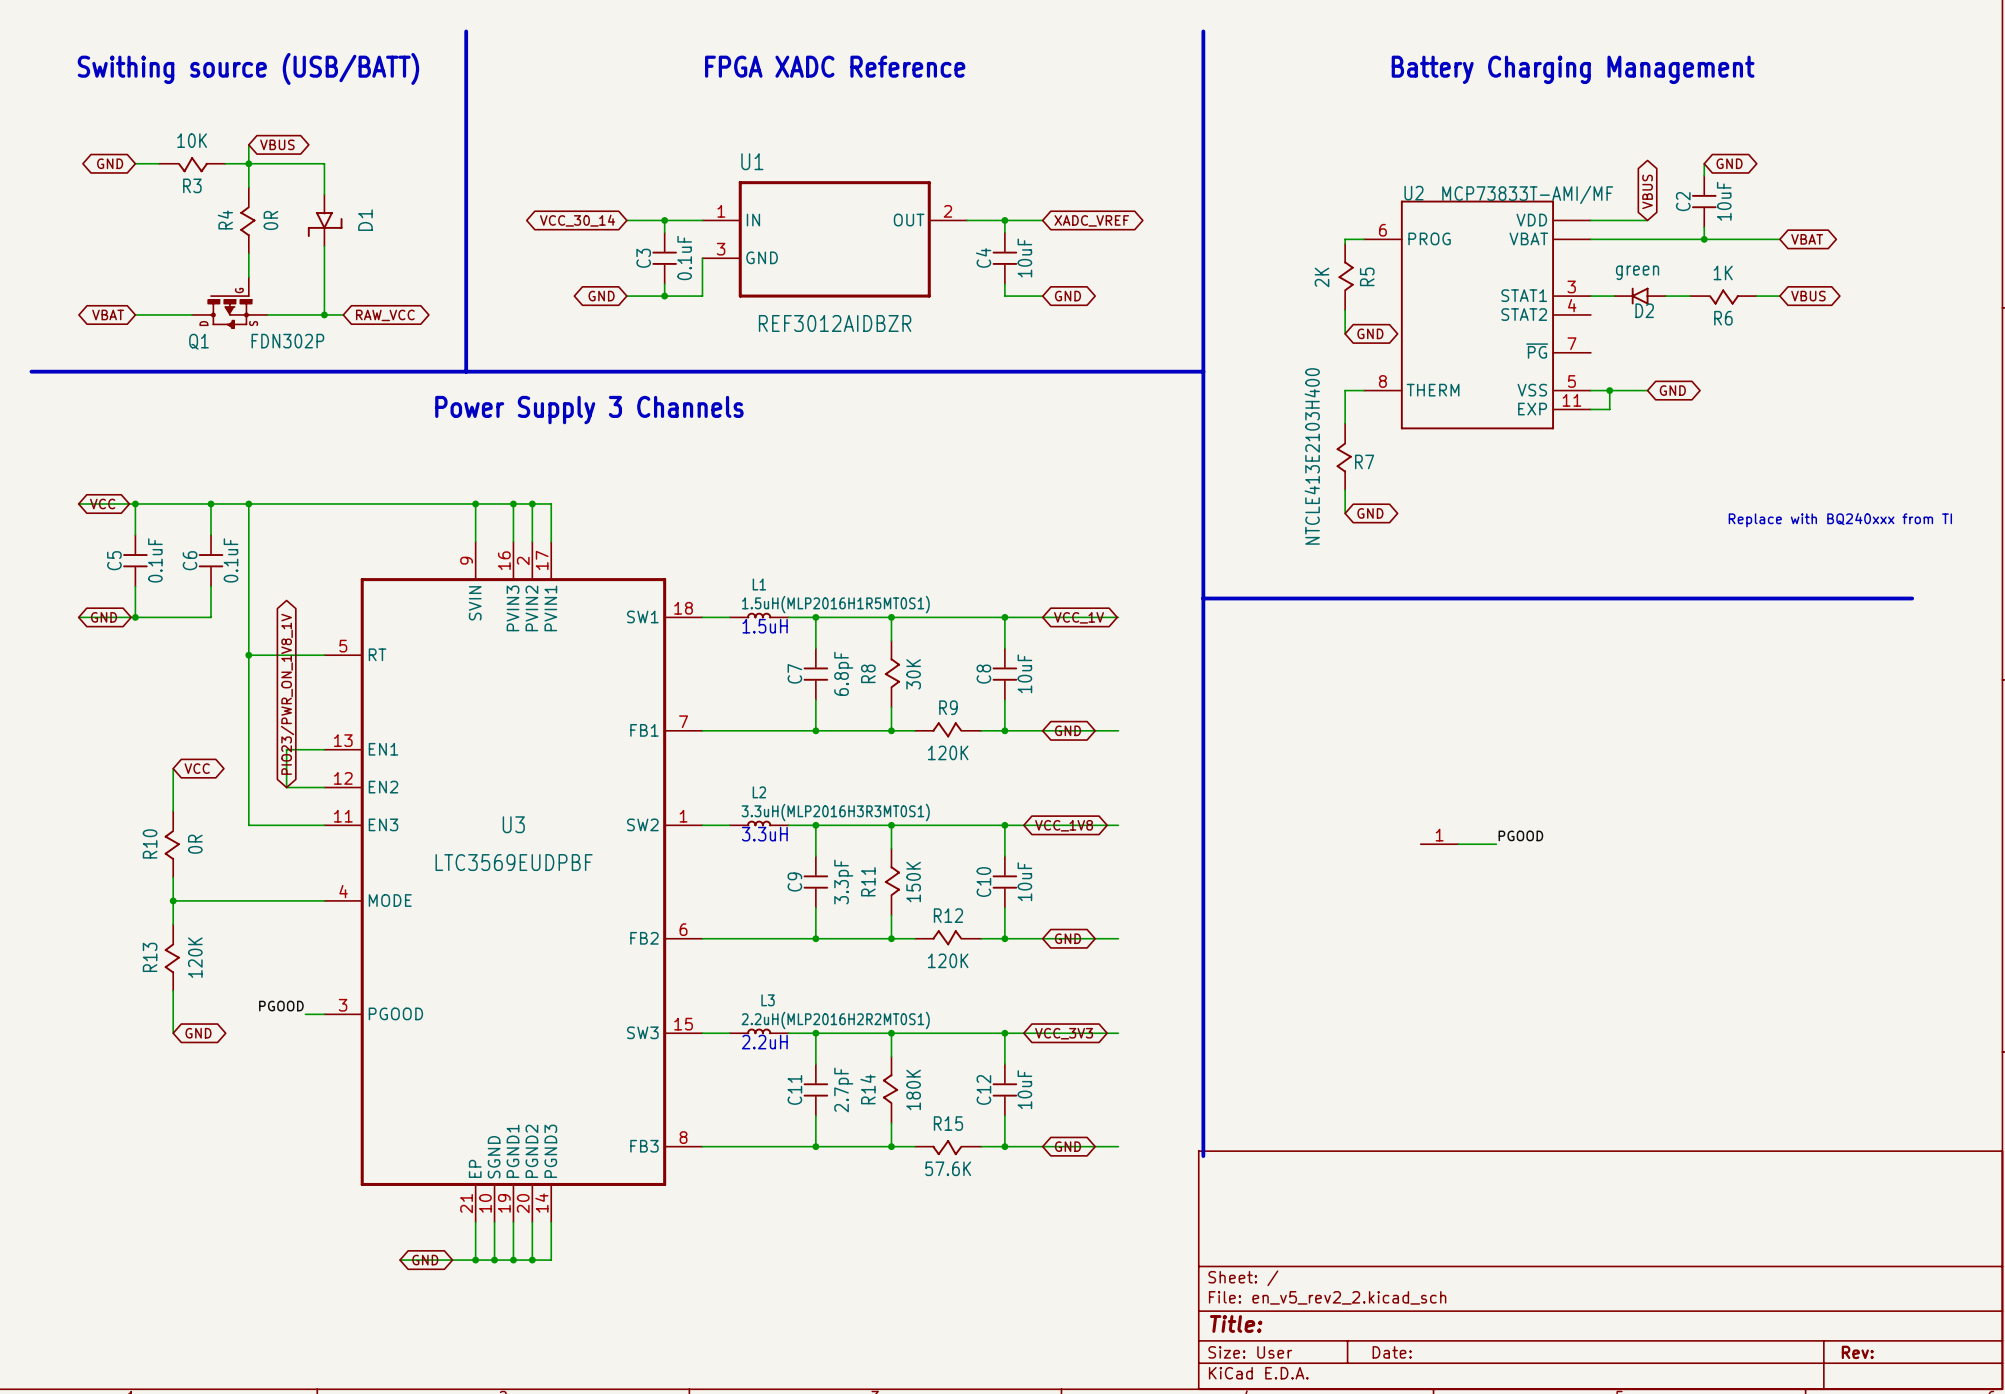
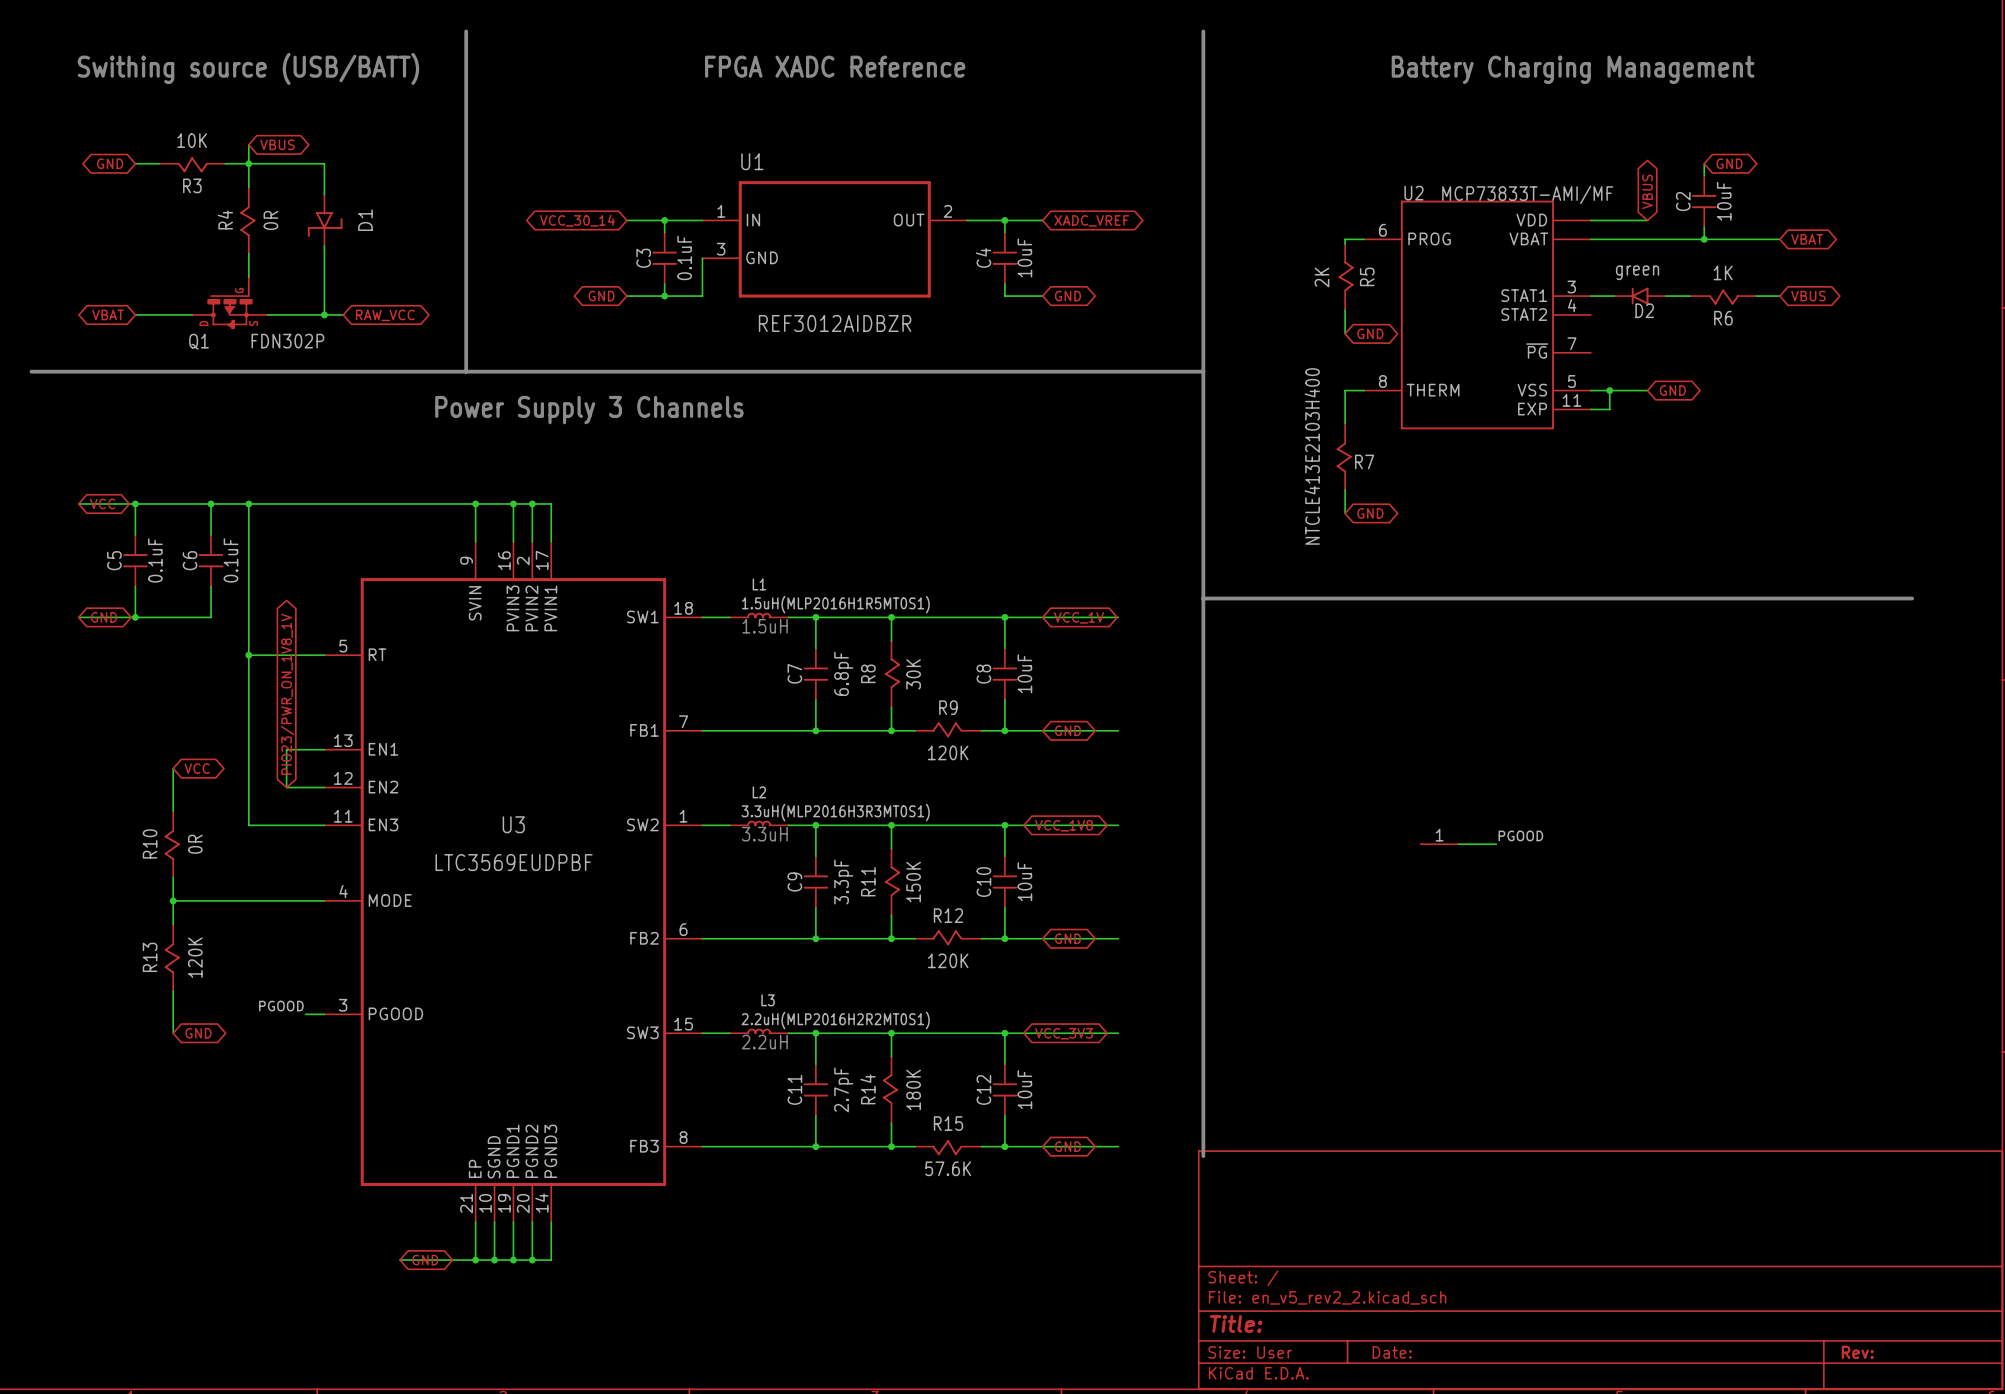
text: Replace with BQ240xxx from TI (1840, 520) -> none

